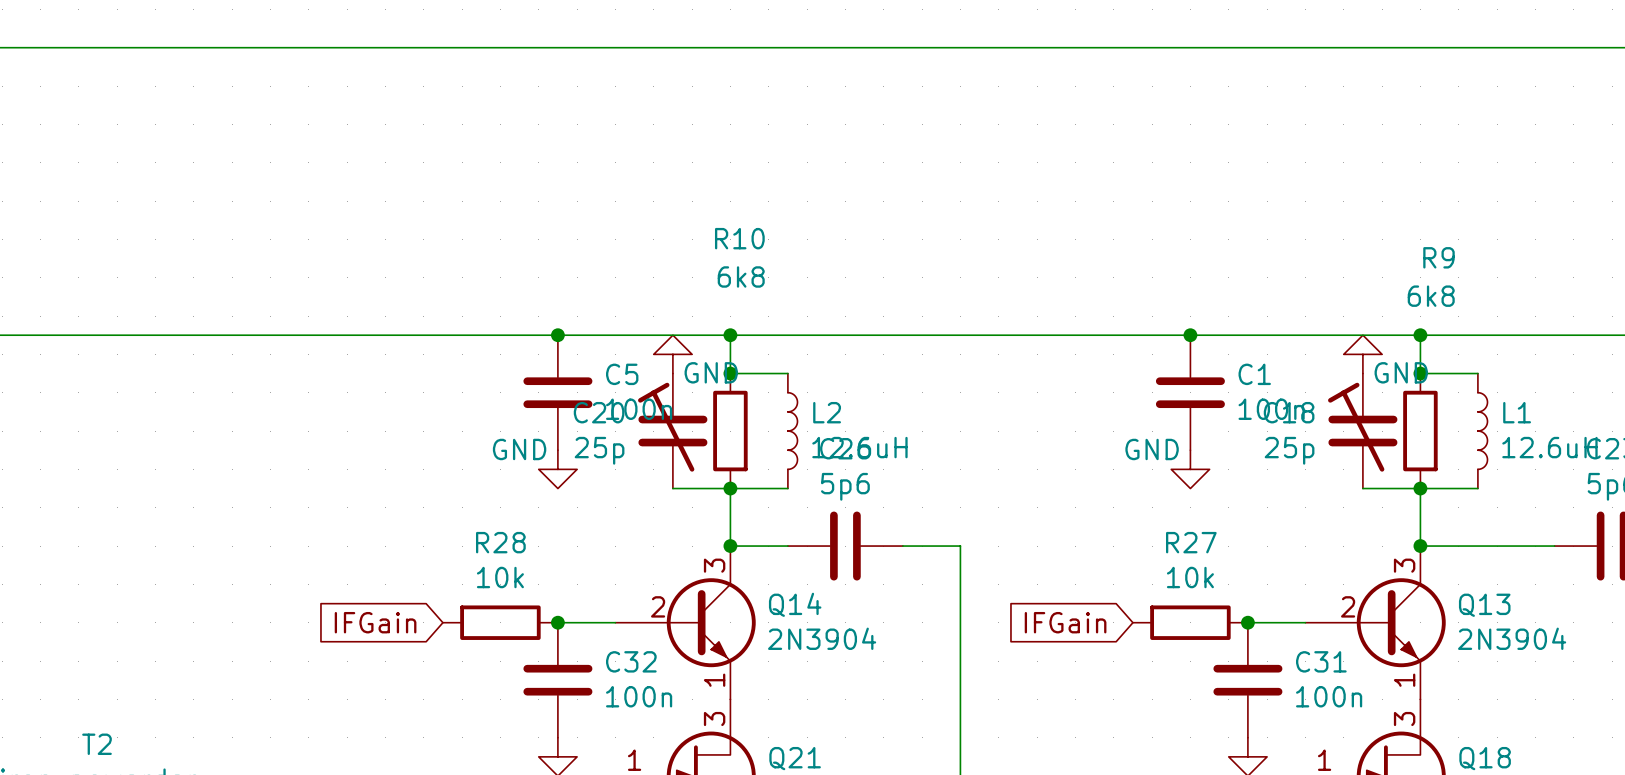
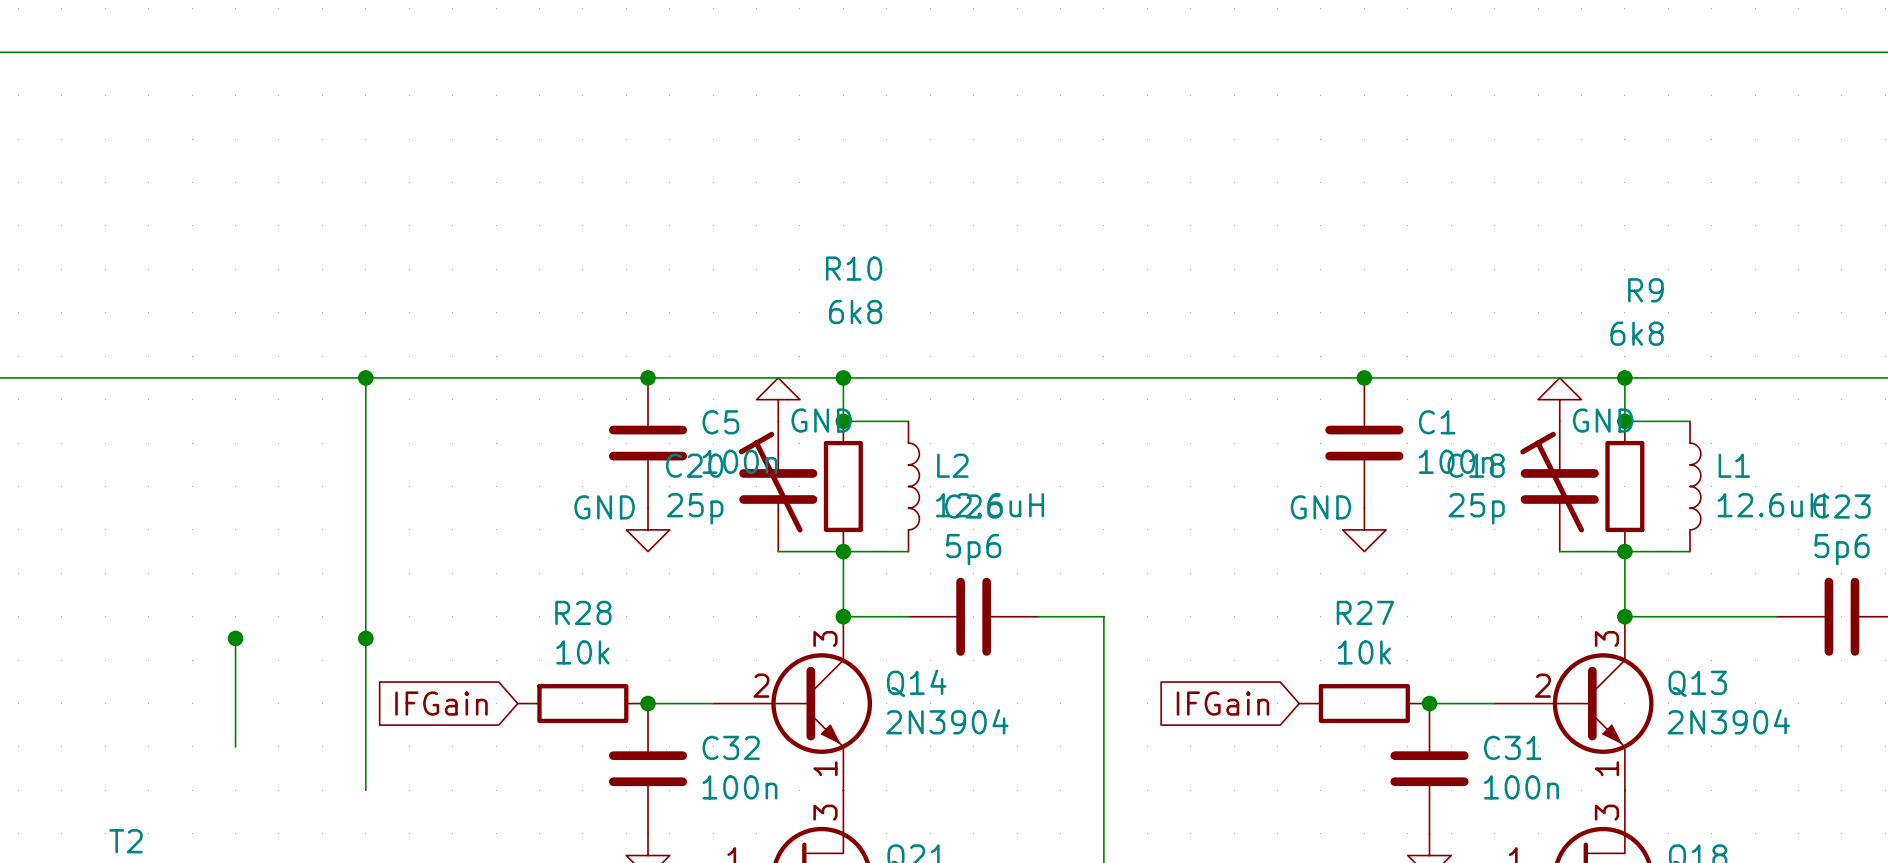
wire: none -> (365, 377) (365, 790)
junction: none -> (365, 377)
wire: none -> (235, 638) (235, 746)
junction: none -> (235, 638)
junction: none -> (365, 638)

